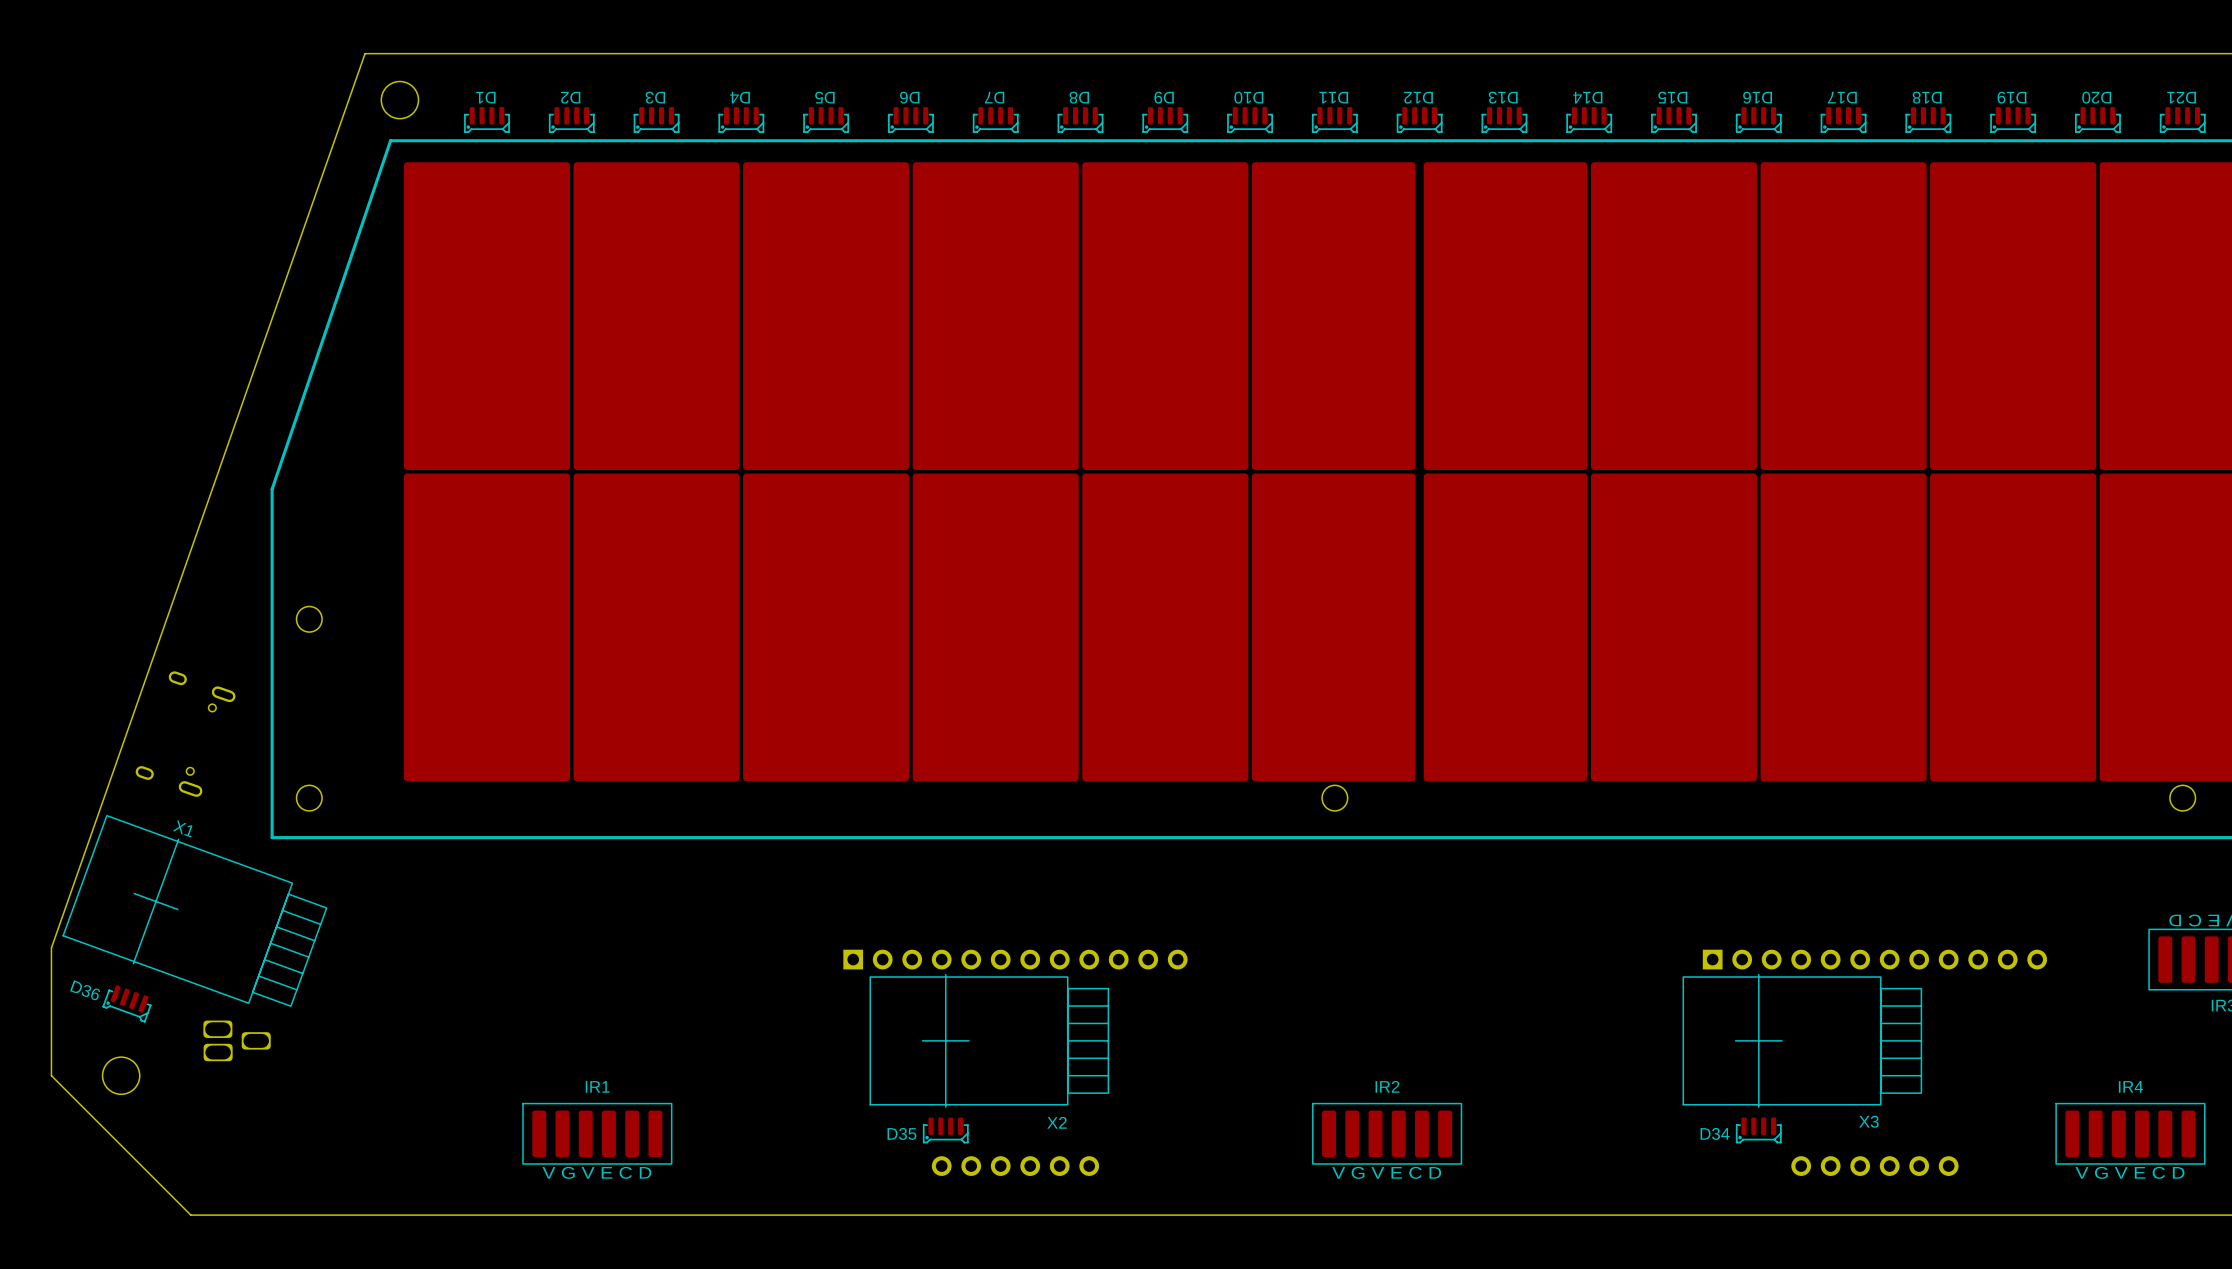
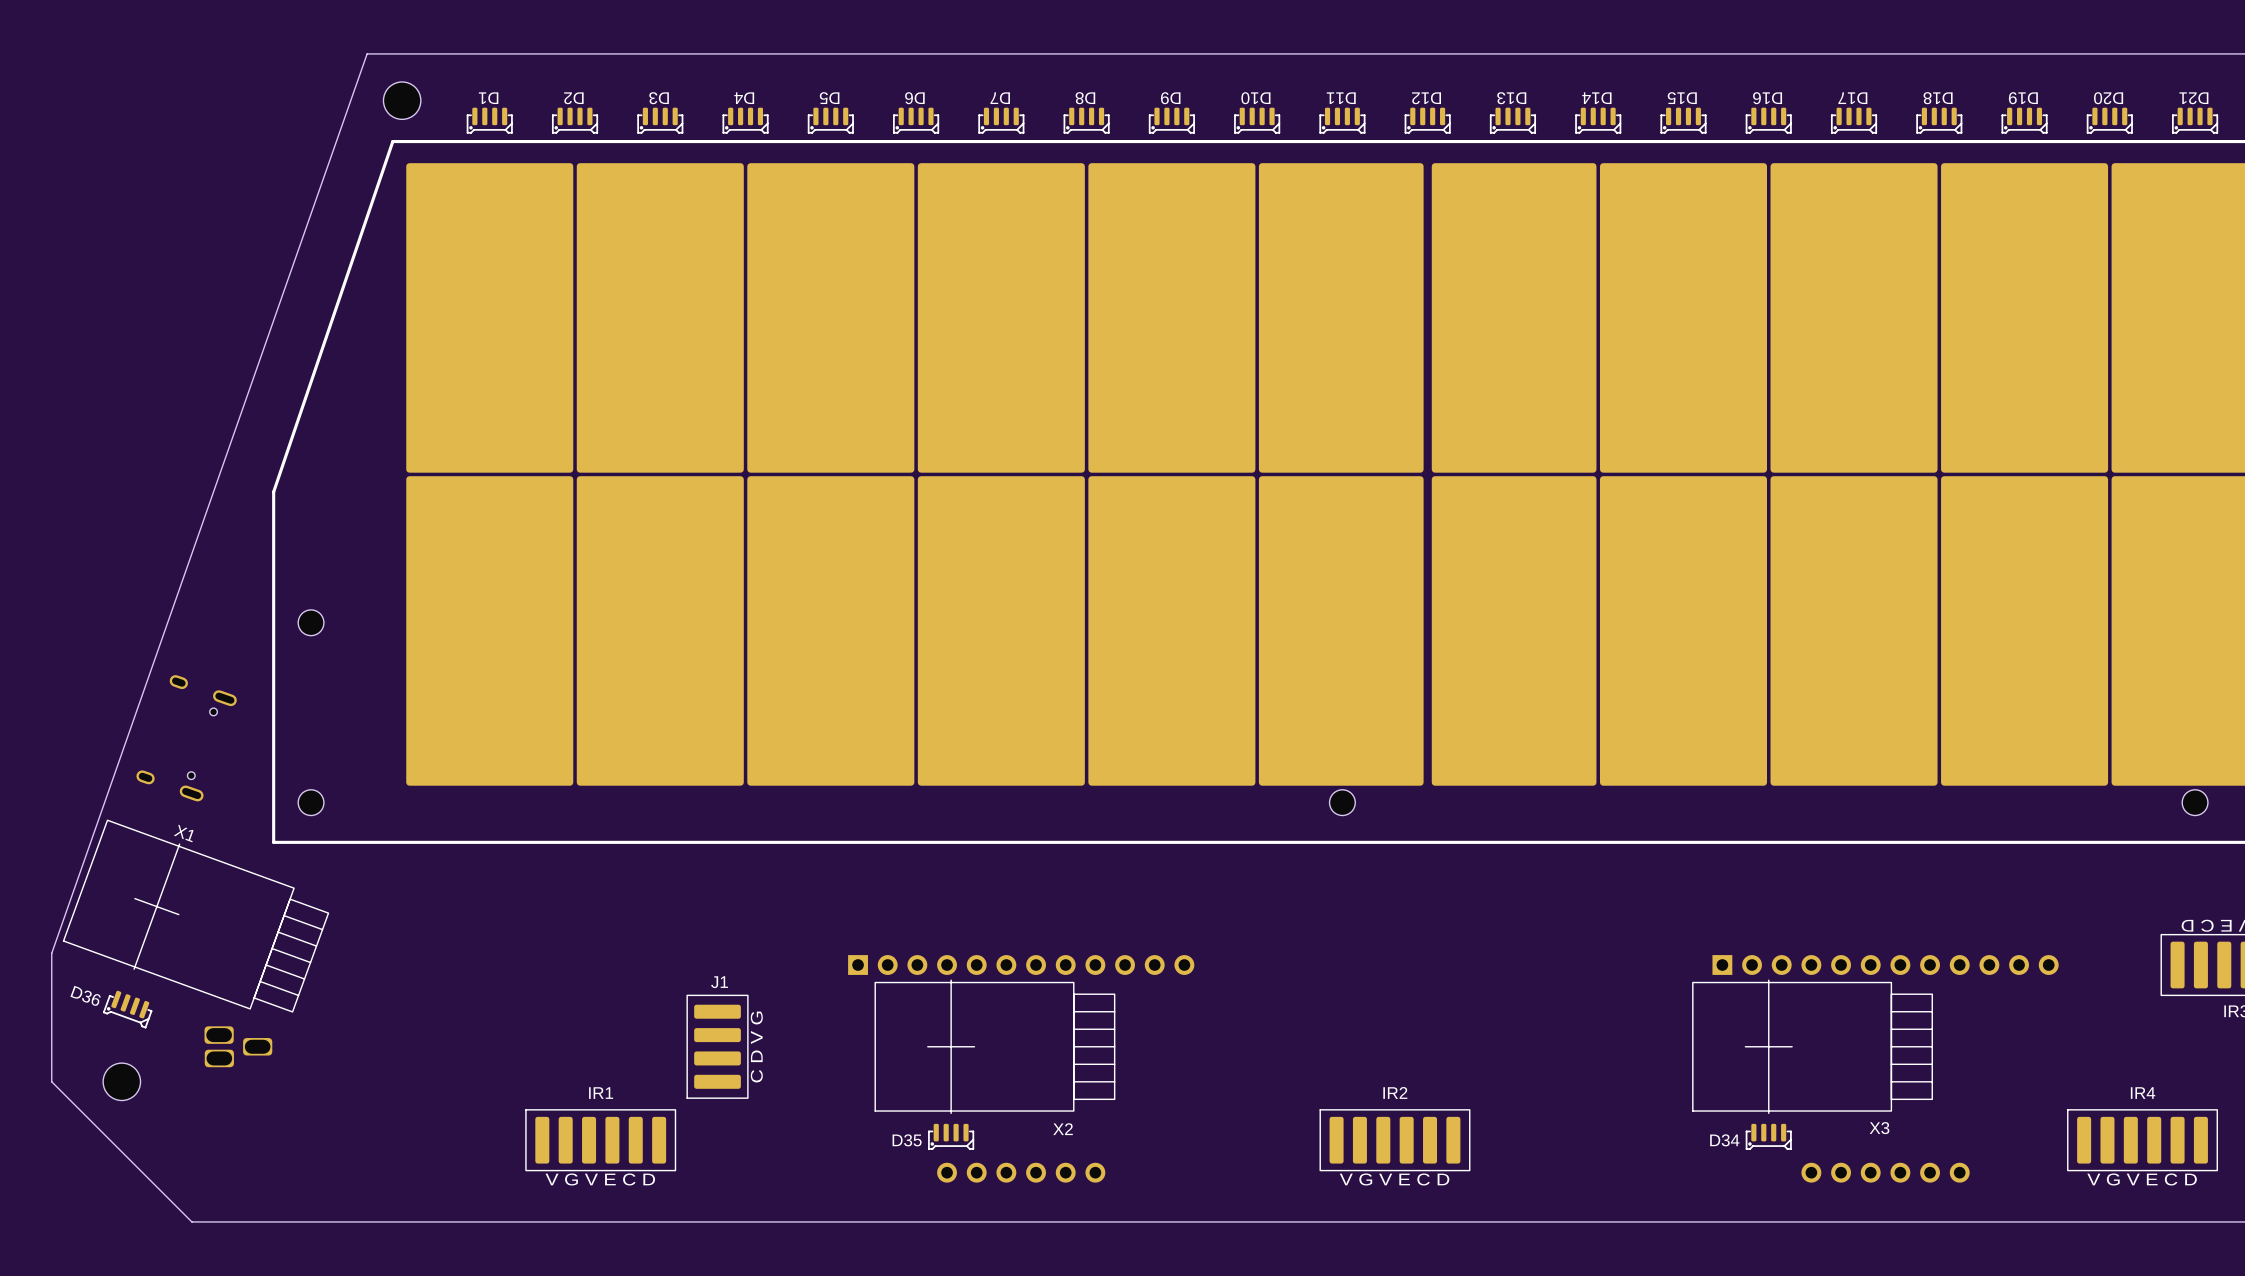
J1: none -> (717, 1046)

